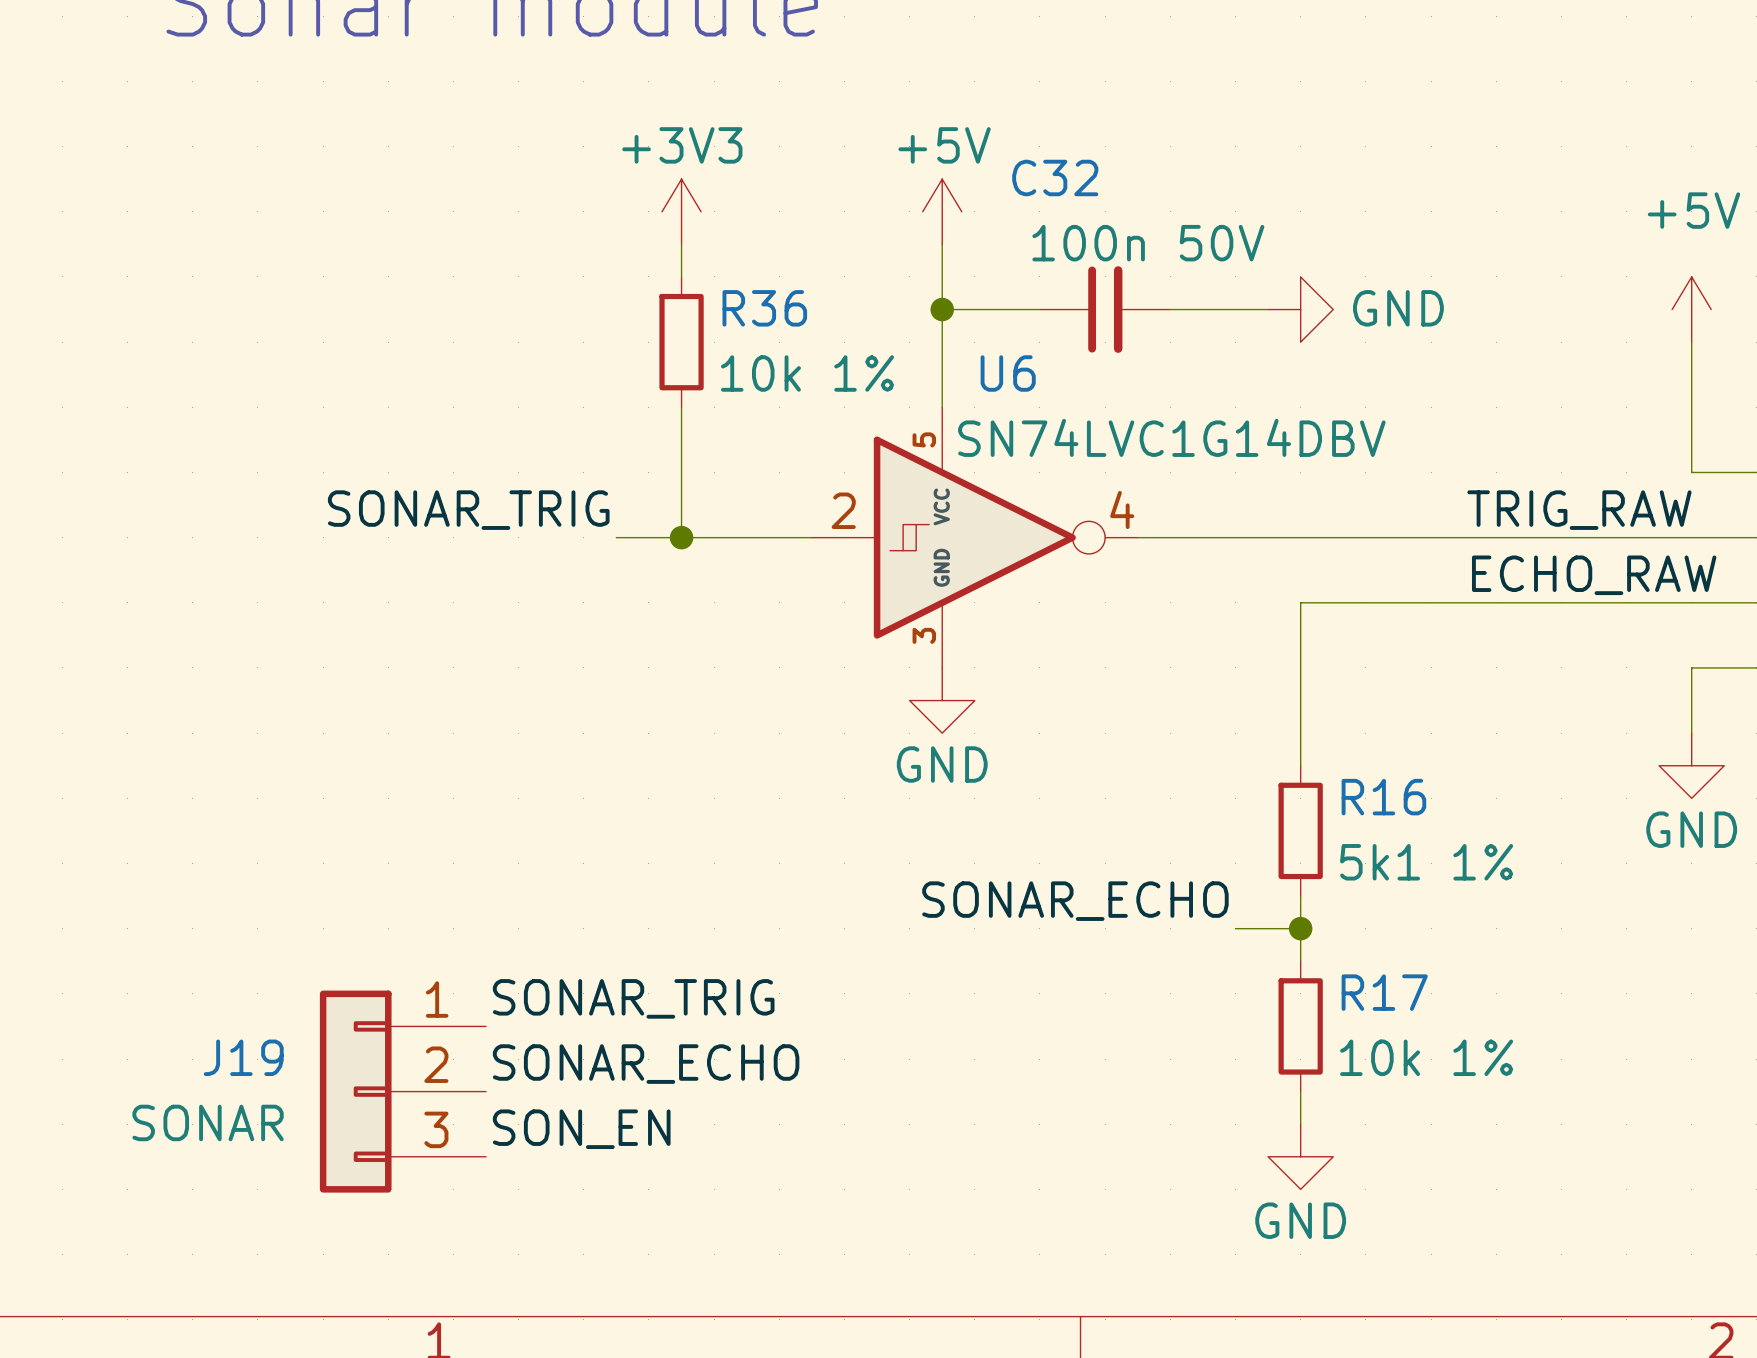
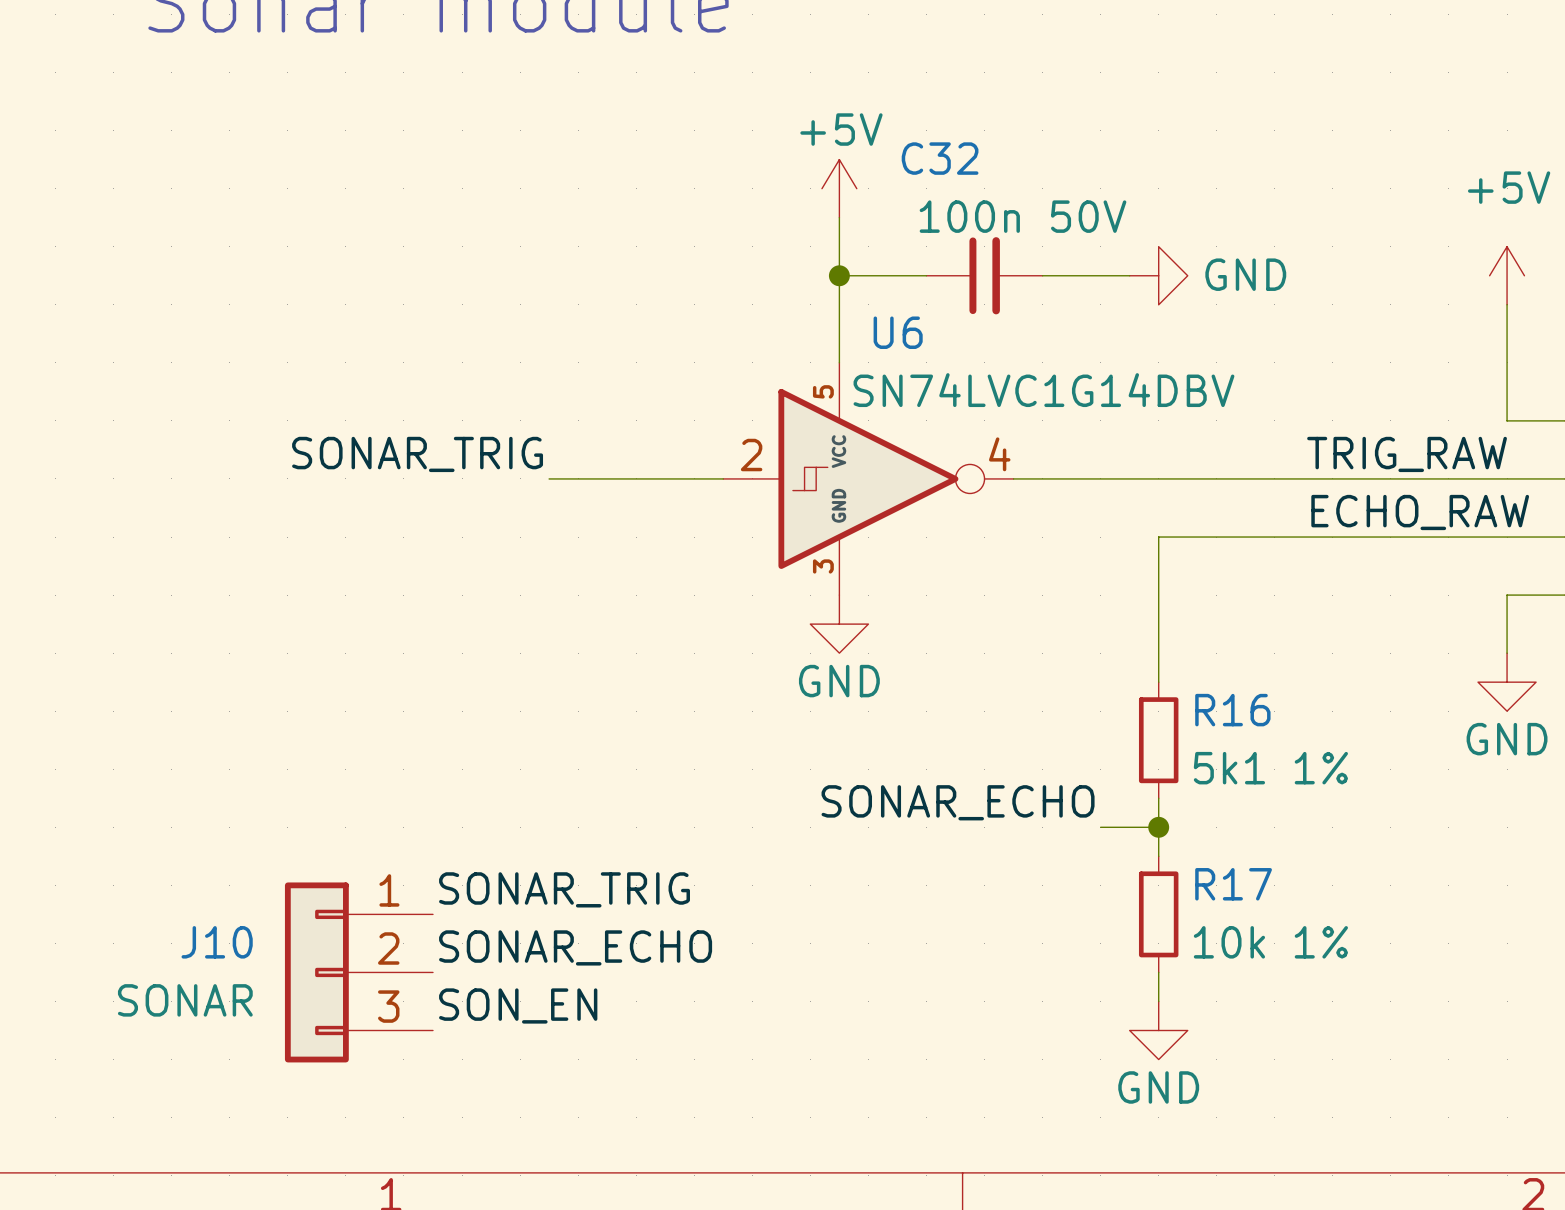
power symbol: +3V3 (681, 211) -> none
wire: (681, 244) (681, 276) -> none
R36: 10k 1% (681, 342) -> none
wire: (681, 407) (681, 537) -> none
junction: (681, 537) -> none
J19 name: J19 (243, 1057) -> J10 (217, 942)

